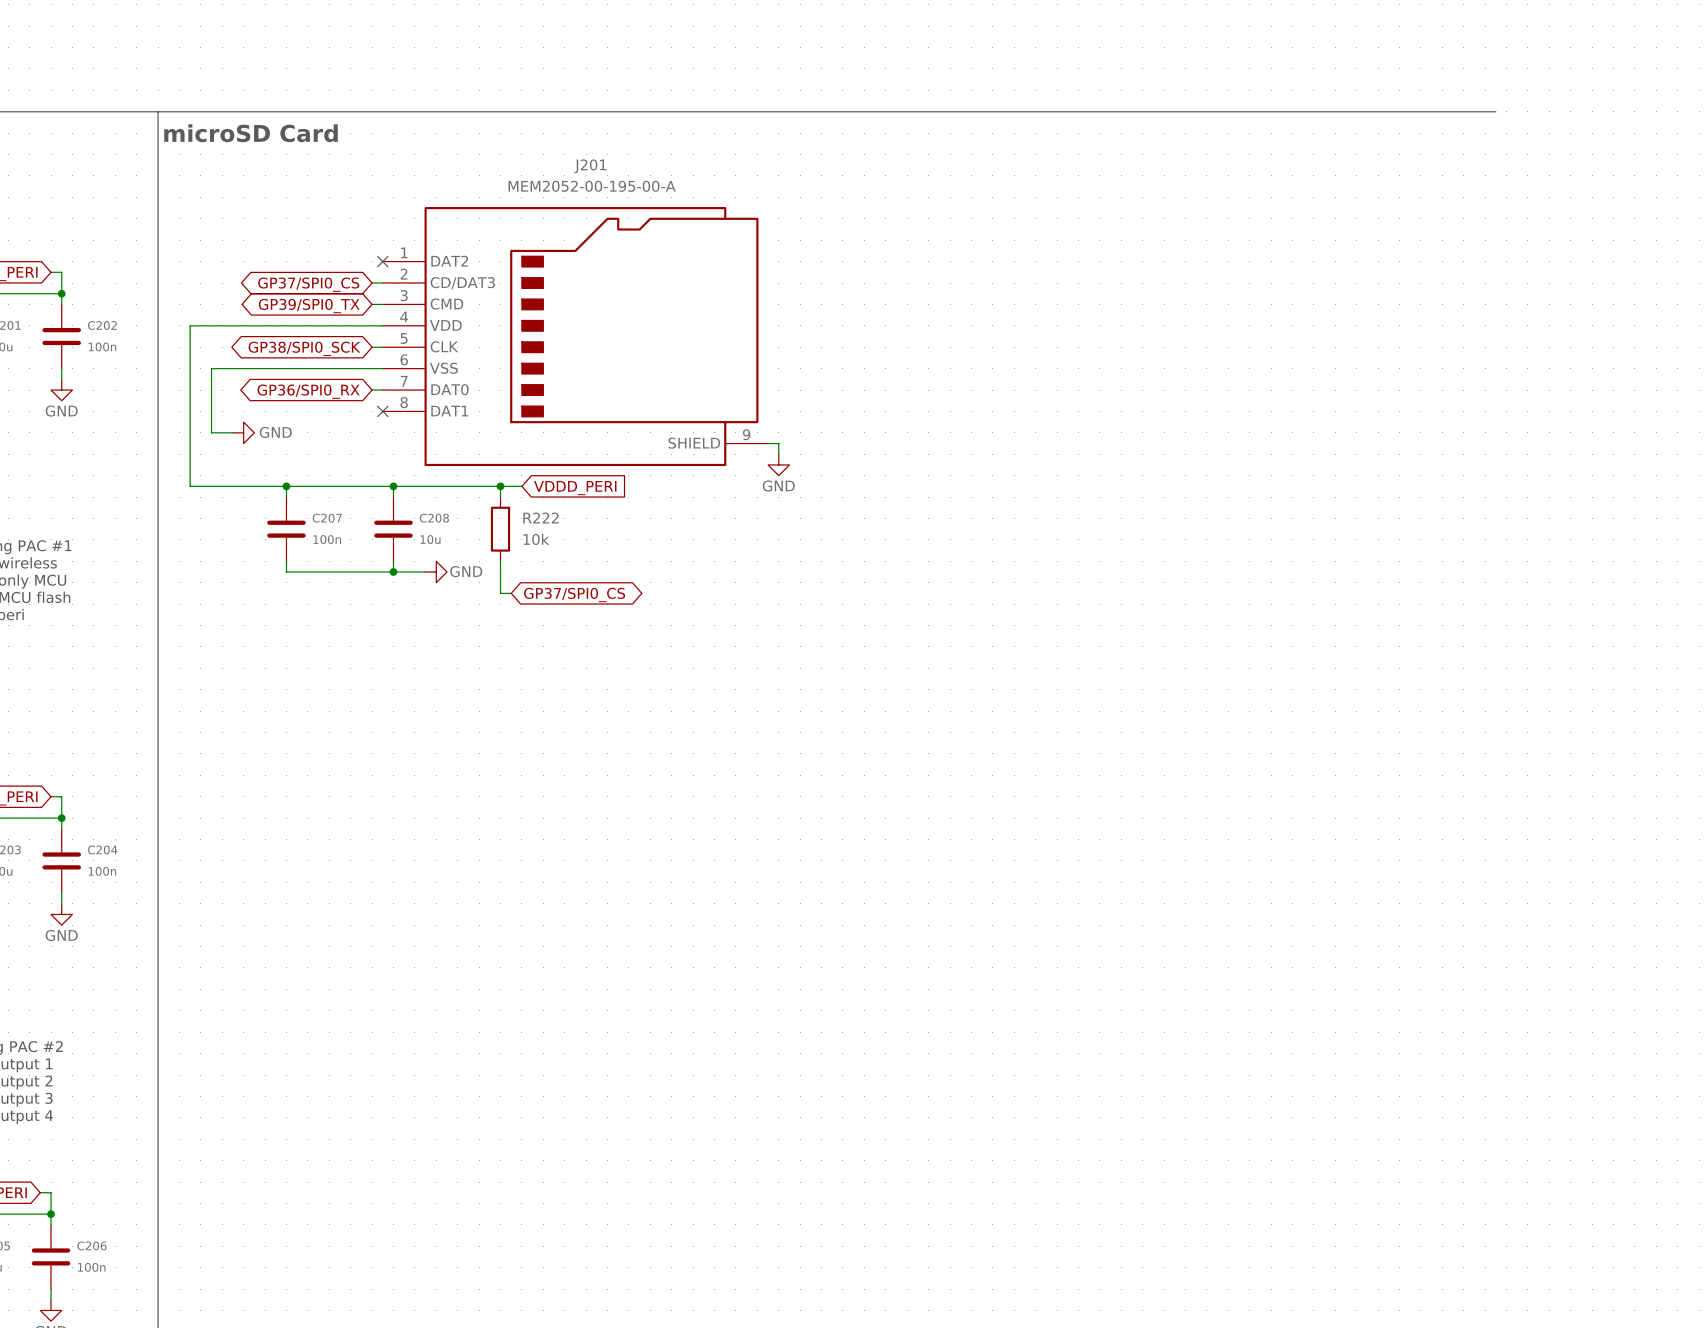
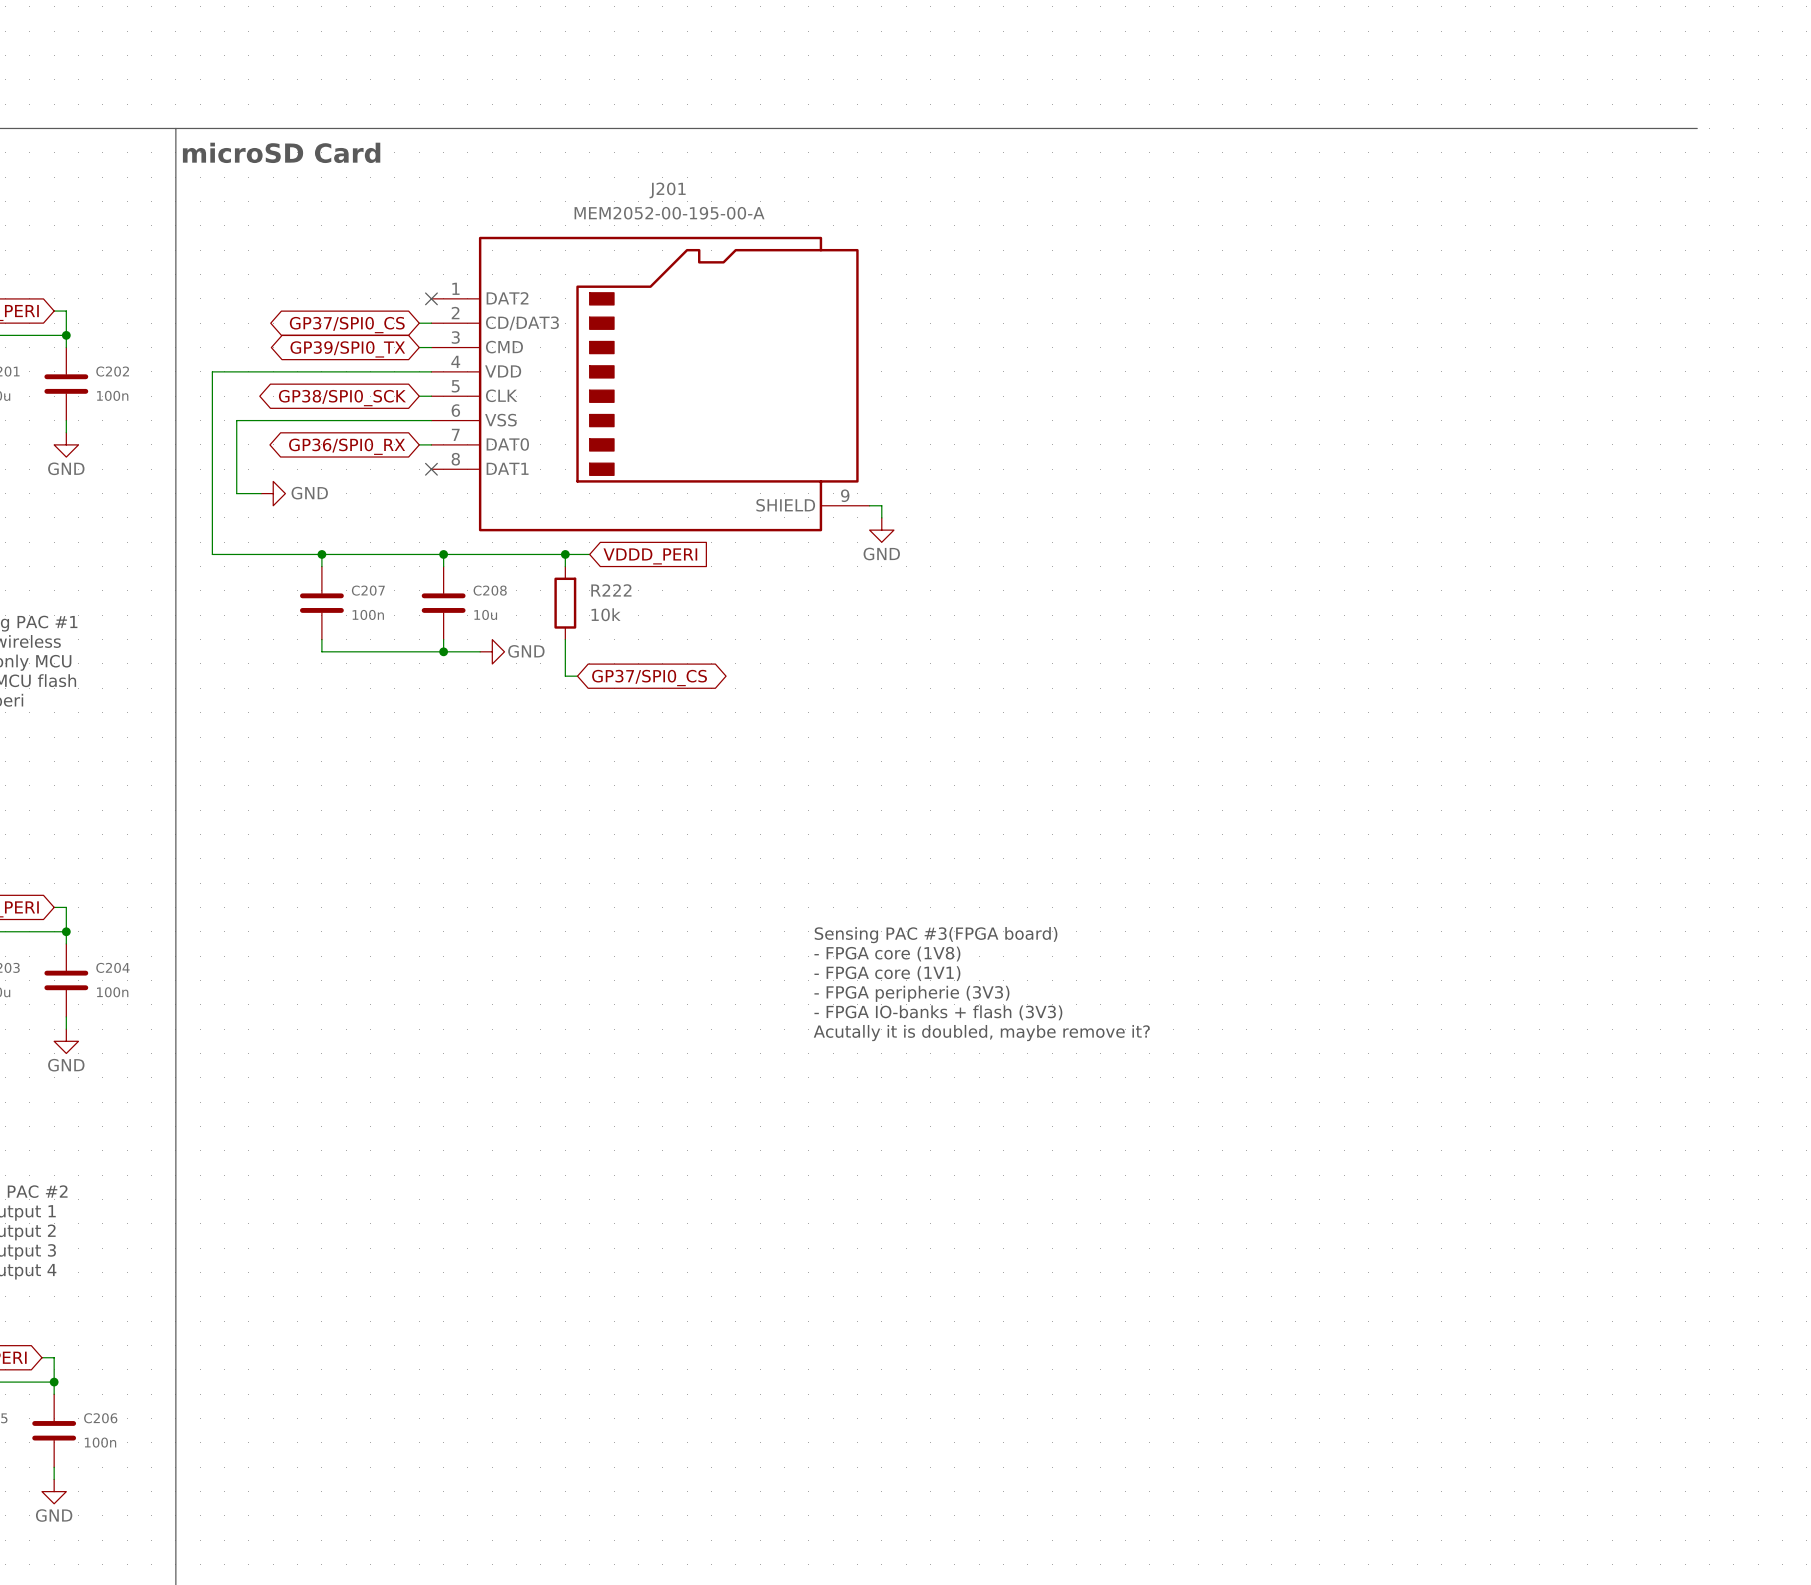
text: none -> Sensing PAC #3(FPGA board) (936, 935)
text: none -> - FPGA core (1V8) (887, 954)
text: none -> - FPGA core (1V1) (887, 973)
text: none -> - FPGA peripherie (3V3) (911, 993)
text: none -> - FPGA IO-banks + flash (3V3) (938, 1012)
text: none -> Acutally it is doubled, maybe remove it? (981, 1033)

